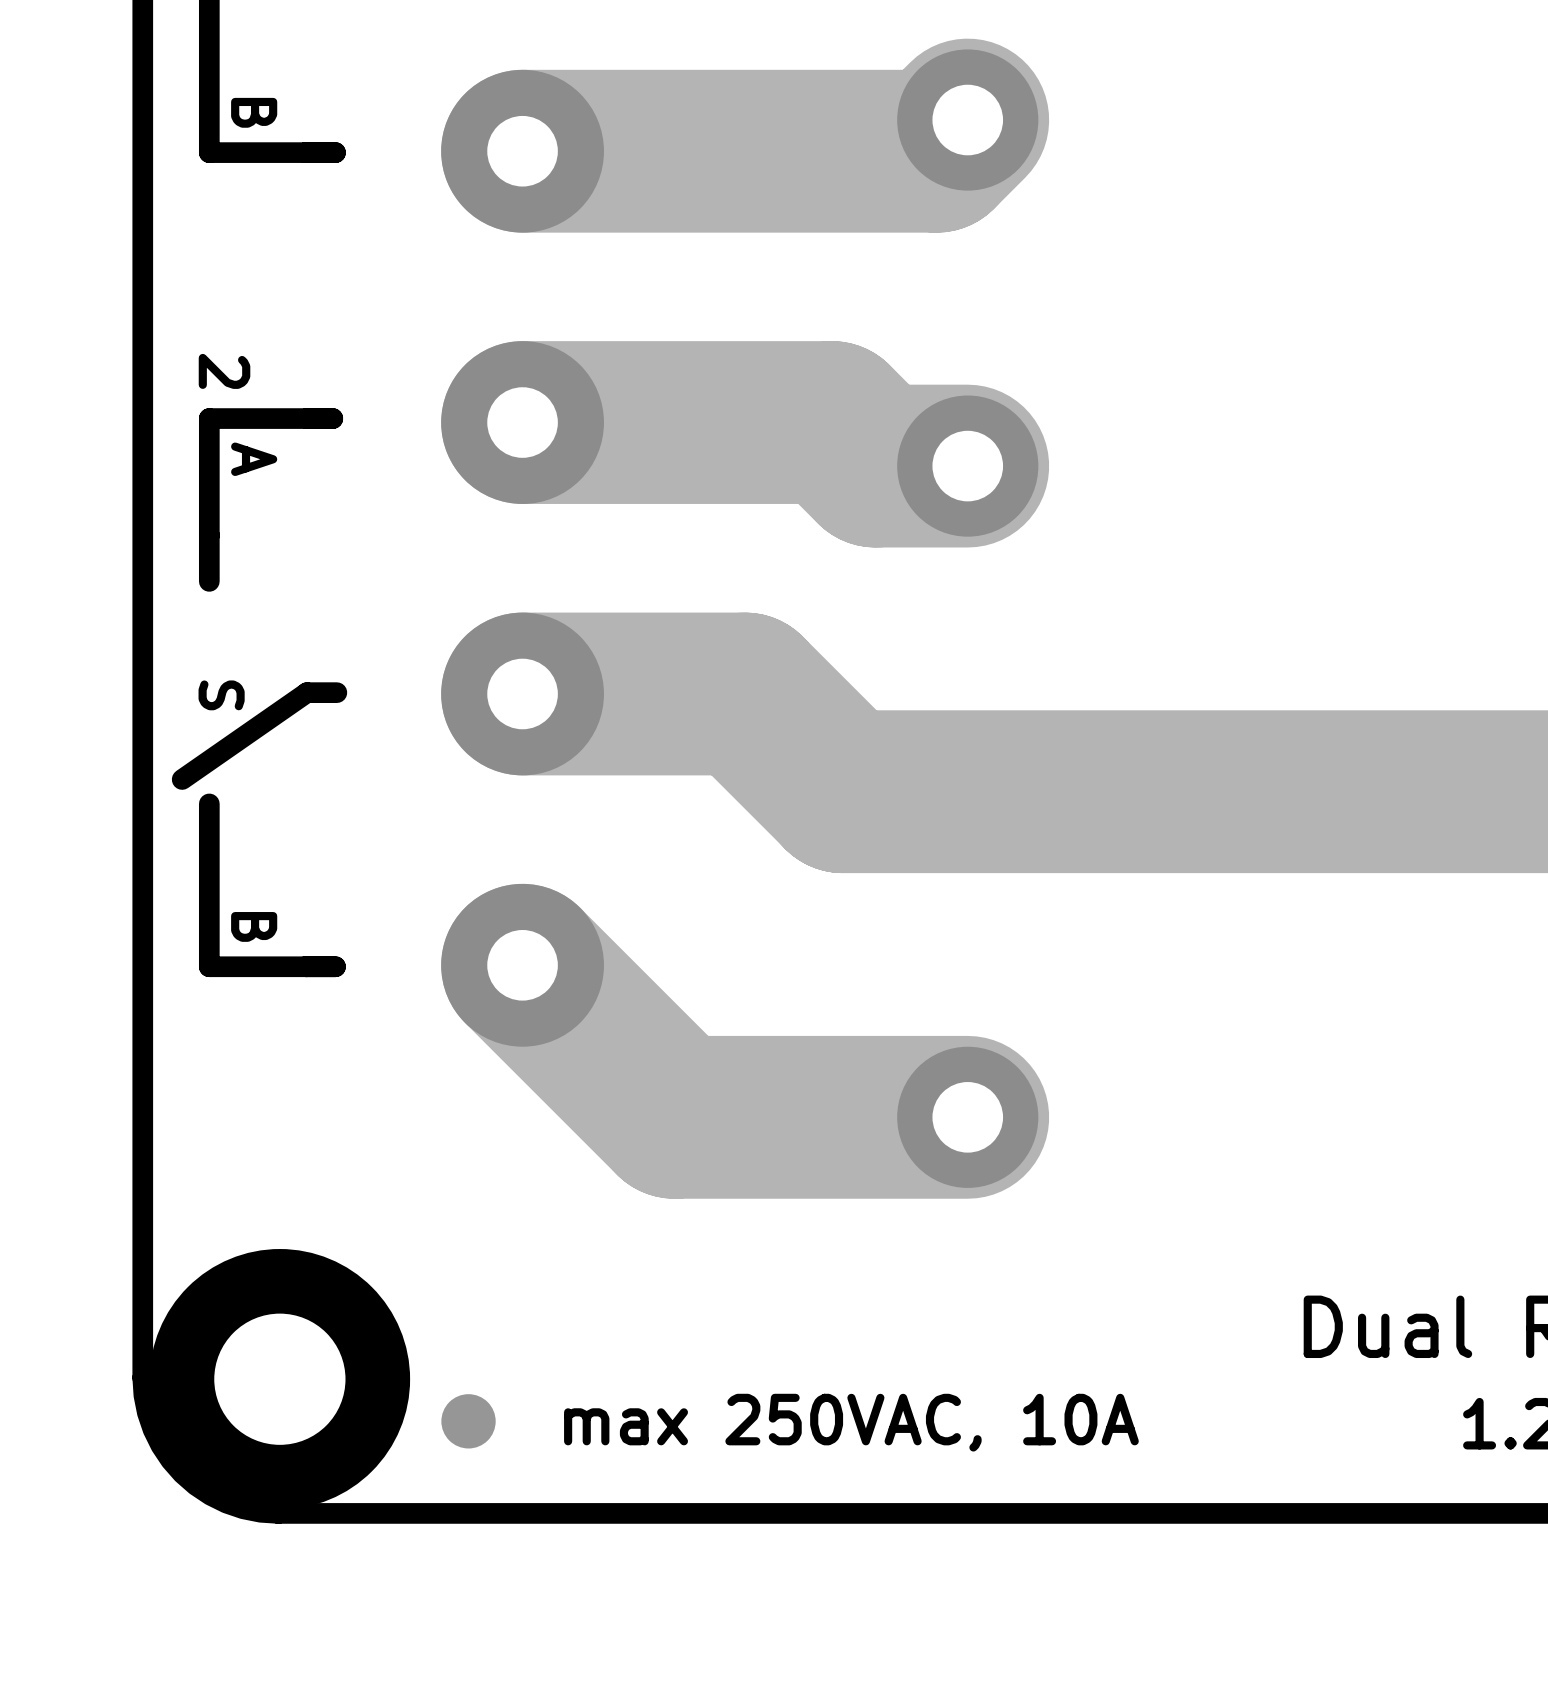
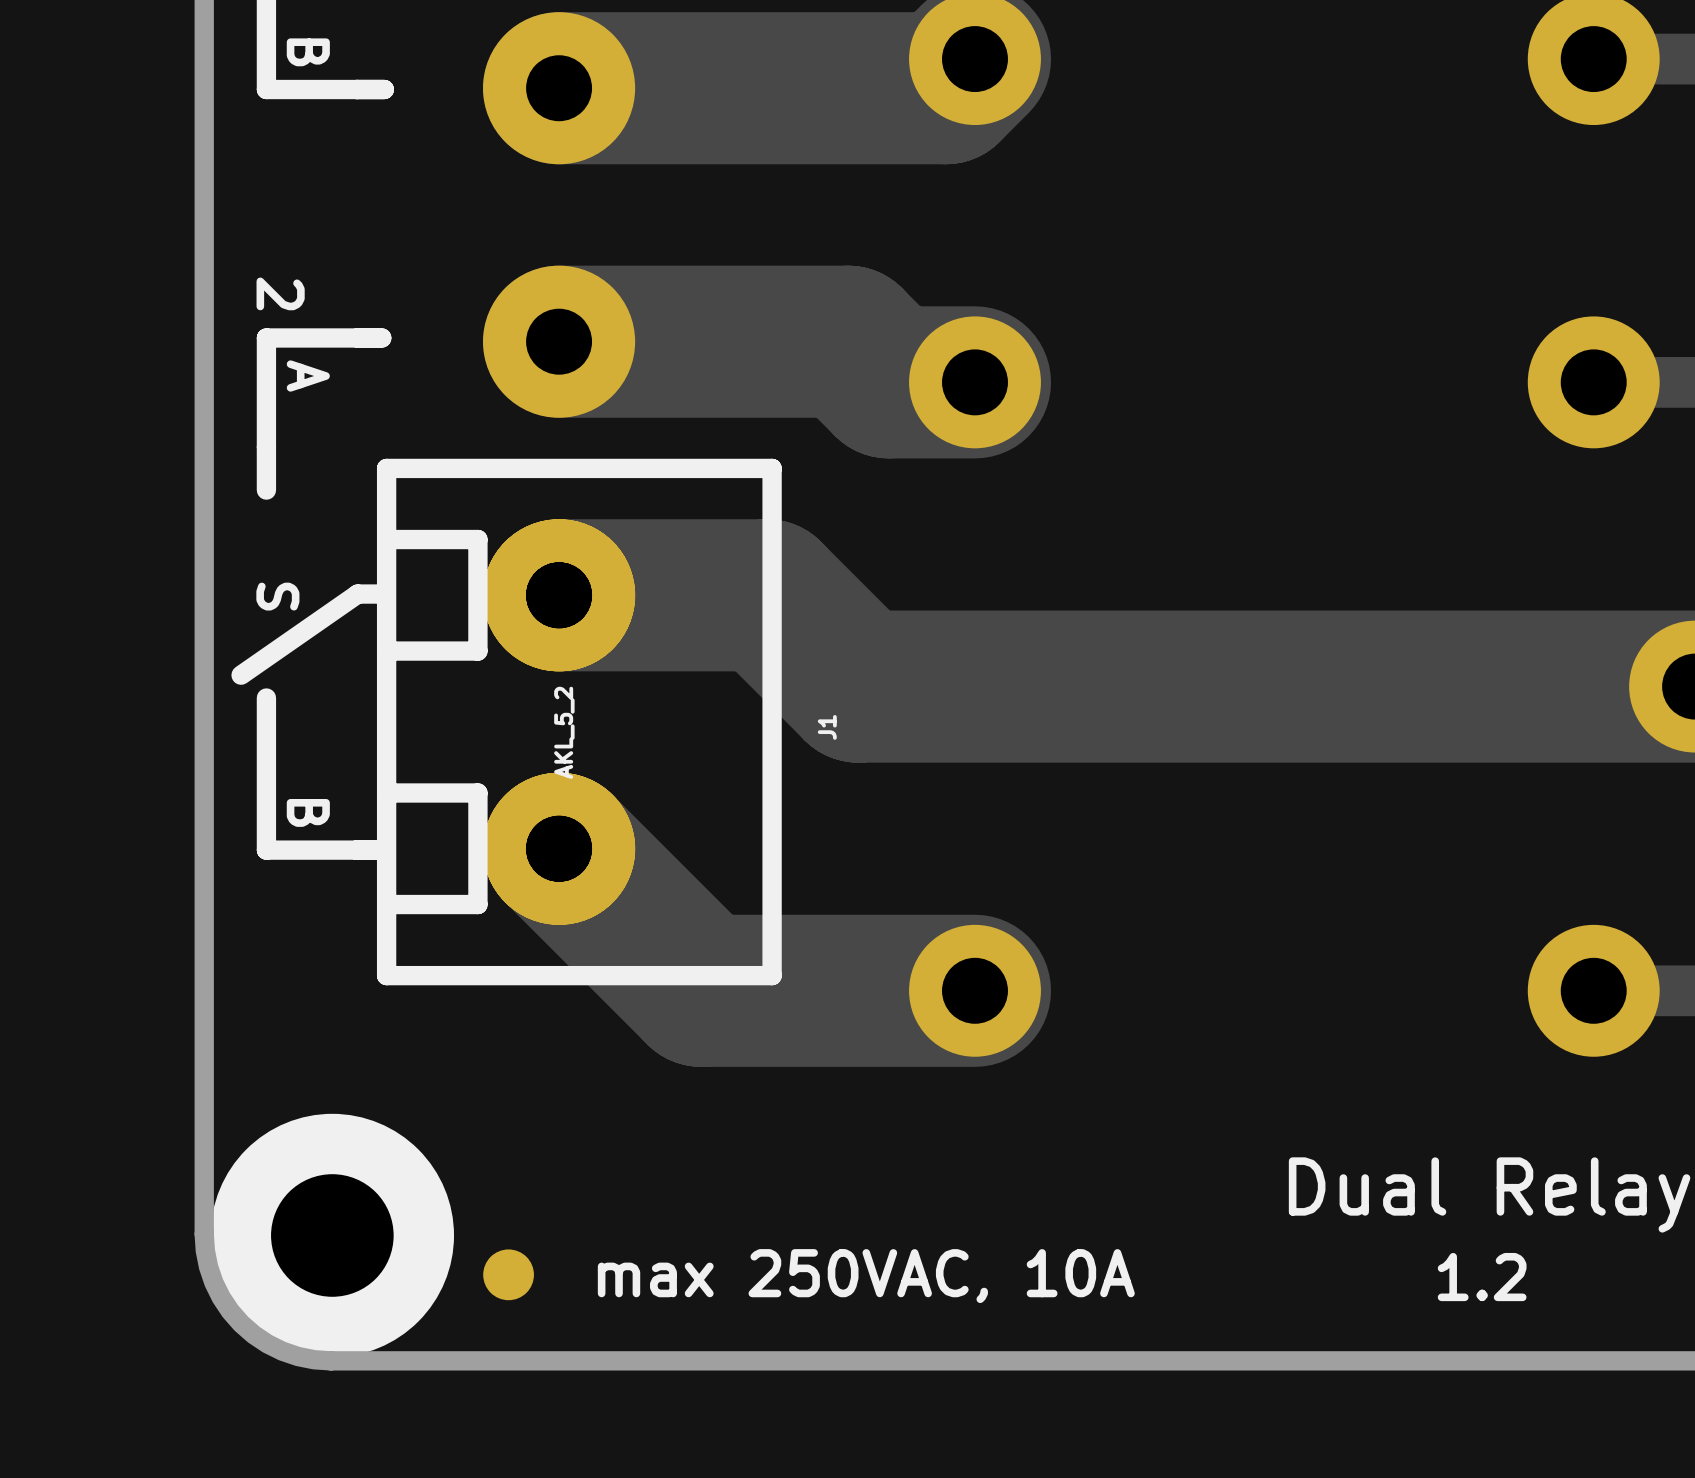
J1: none -> AKL_5_2 (579, 722)

